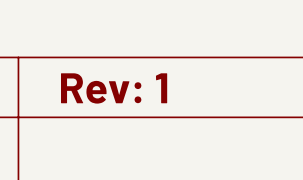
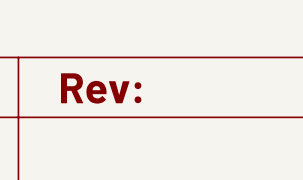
title block: Rev: 1 (114, 88) -> Rev: (101, 88)

